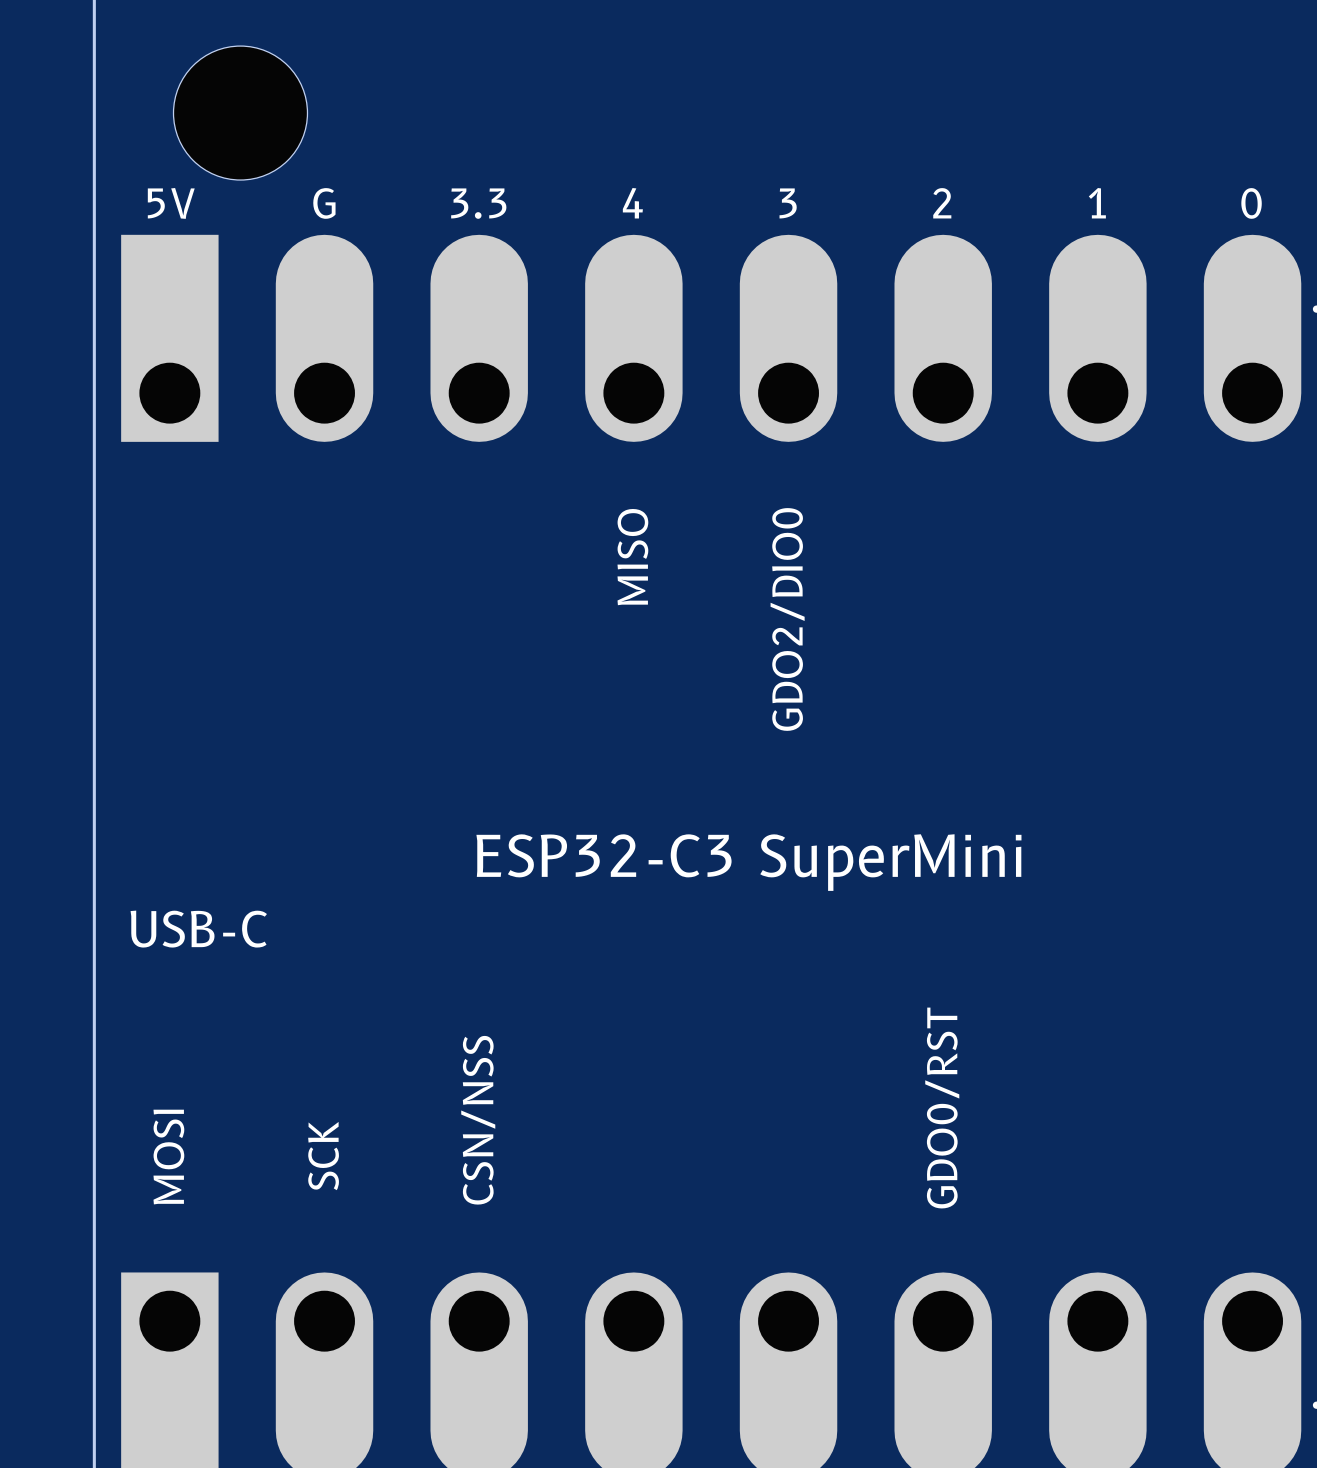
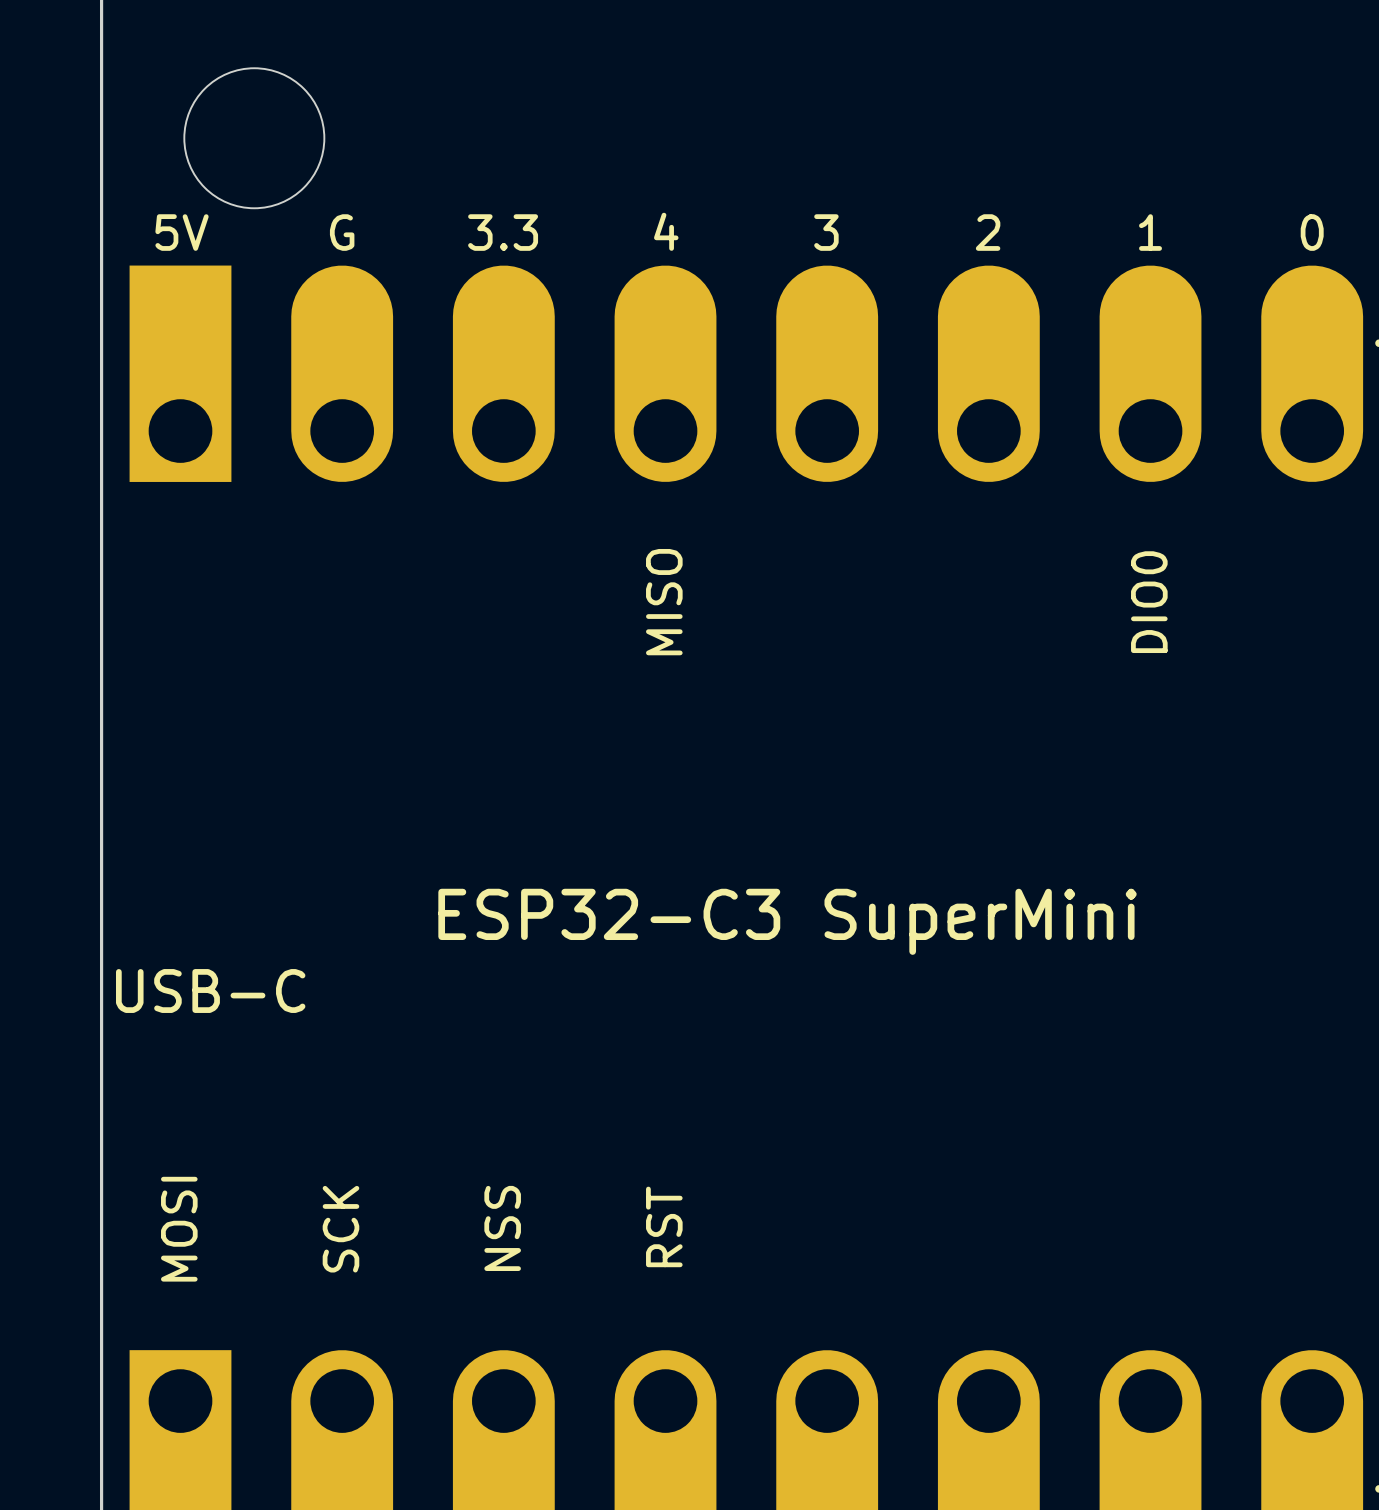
text: none -> DIO0 (1149, 602)
text: GDO2/DIO0 (787, 619) -> none
text: GDO0/RST (942, 1108) -> none
text: CSN/NSS (478, 1120) -> NSS (502, 1228)
text: none -> RST (664, 1226)

